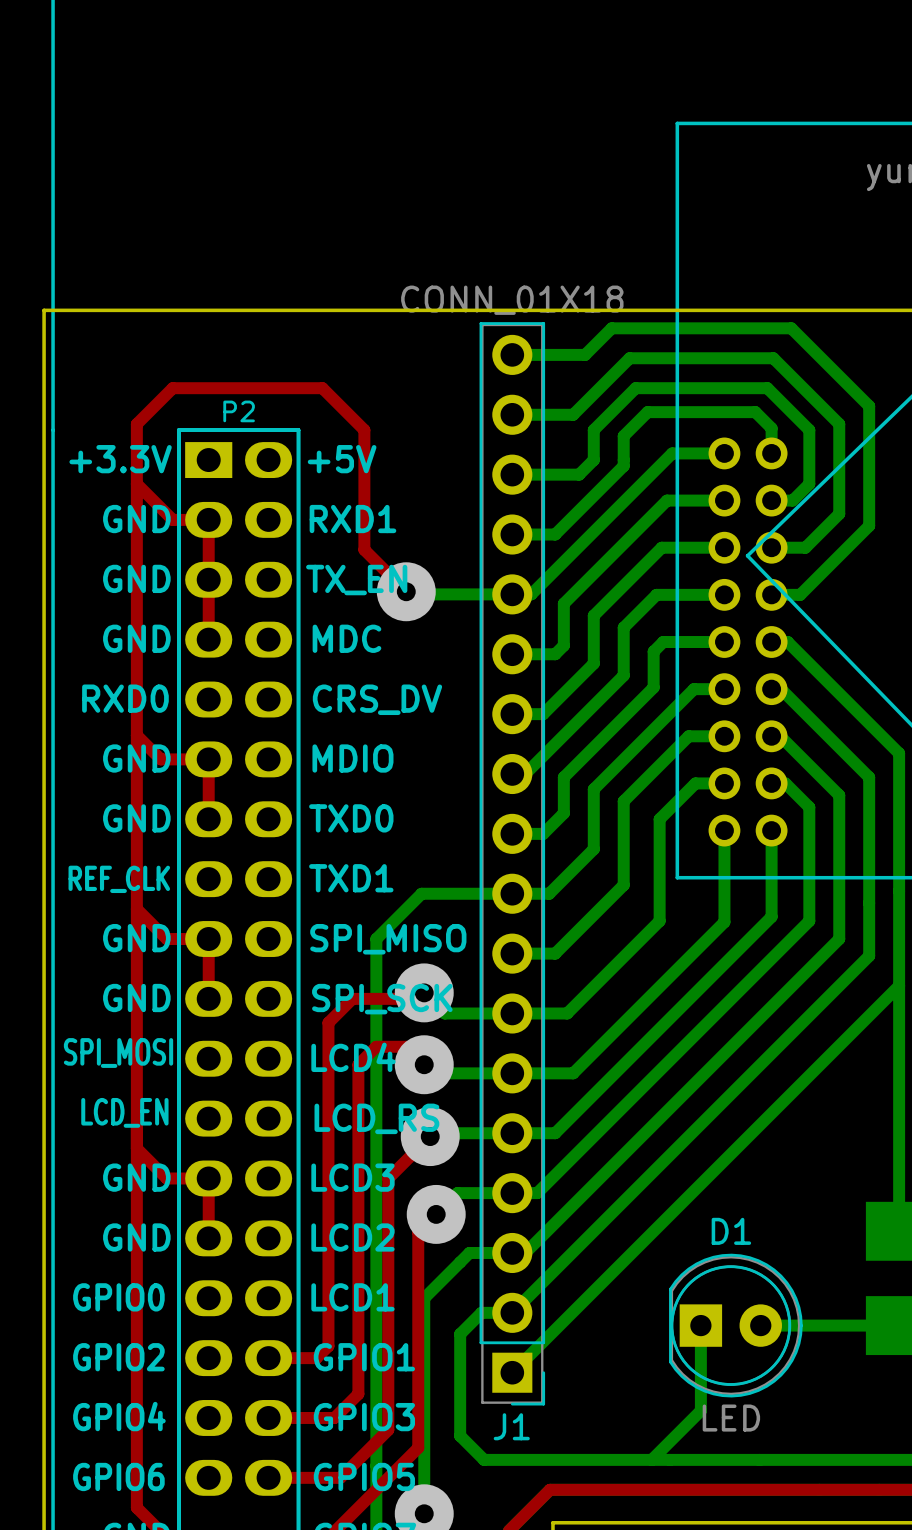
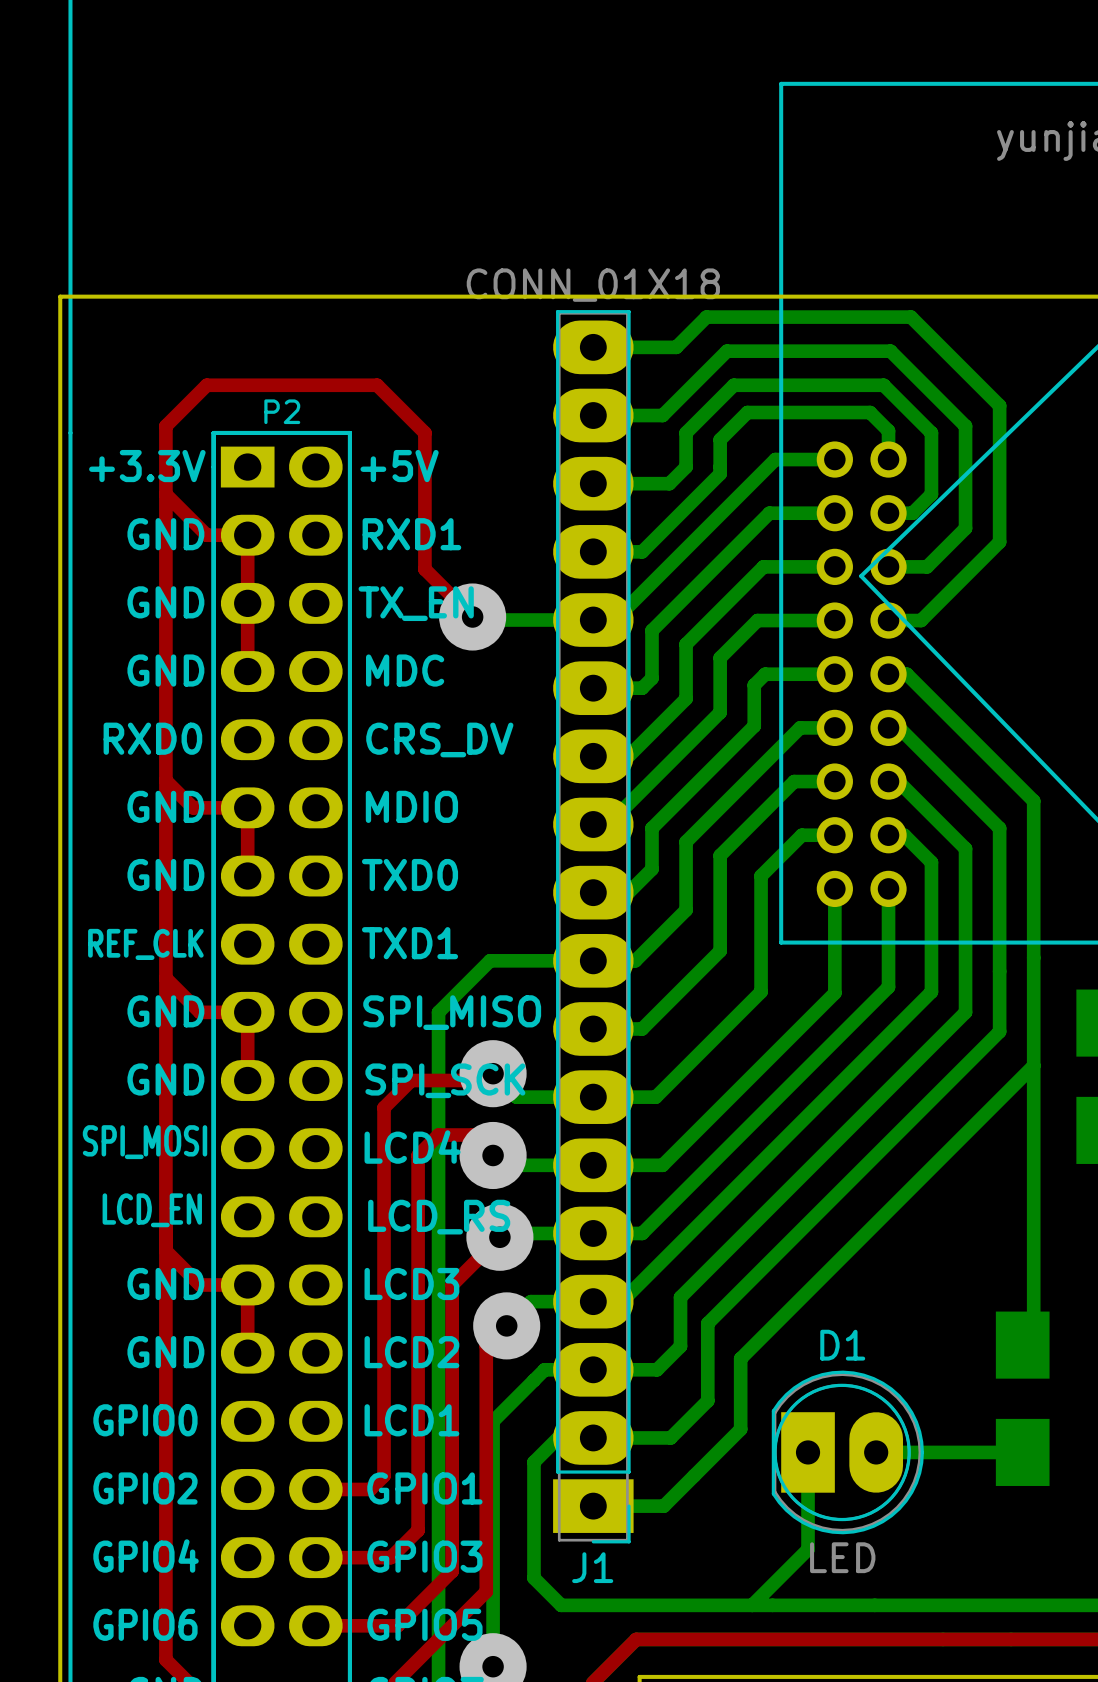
J1 footprint: [479, 322, 546, 1406] -> [553, 310, 634, 1544]
bottom track: (588, 1189) (525, 1252) -> (680, 1297) (680, 1346) (657, 1369) (608, 1369)
bottom track: (612, 1212) (512, 1312) -> (707, 1323) (707, 1400) (670, 1437) (593, 1437)
bottom track: (641, 1243) (512, 1372) -> (740, 1358) (740, 1429) (663, 1506) (593, 1506)
D1 footprint: [669, 1253, 803, 1398] -> [771, 1370, 924, 1535]

